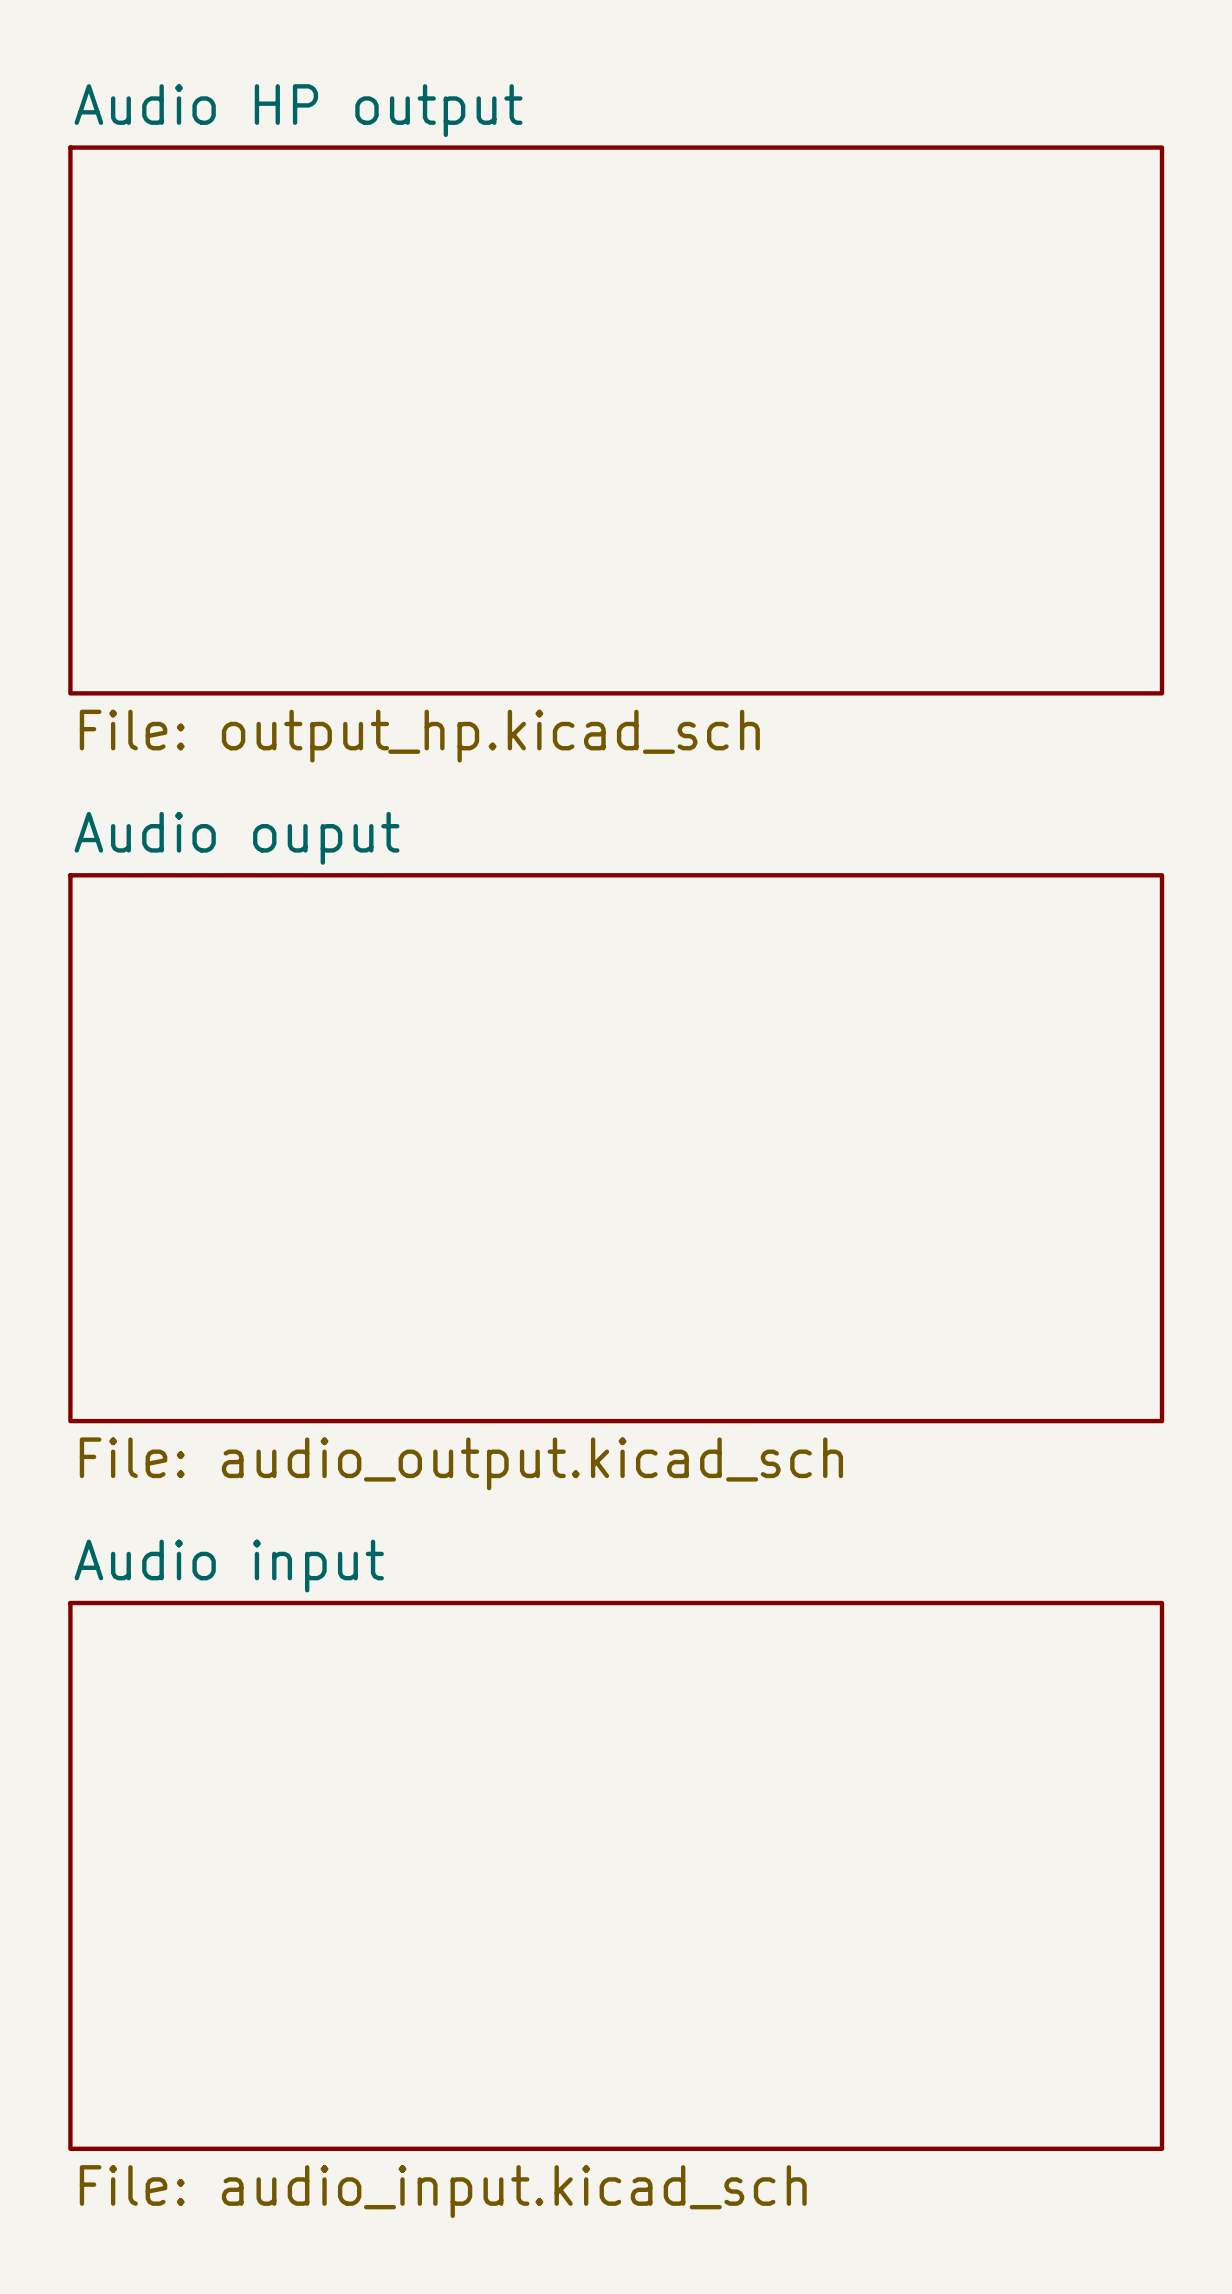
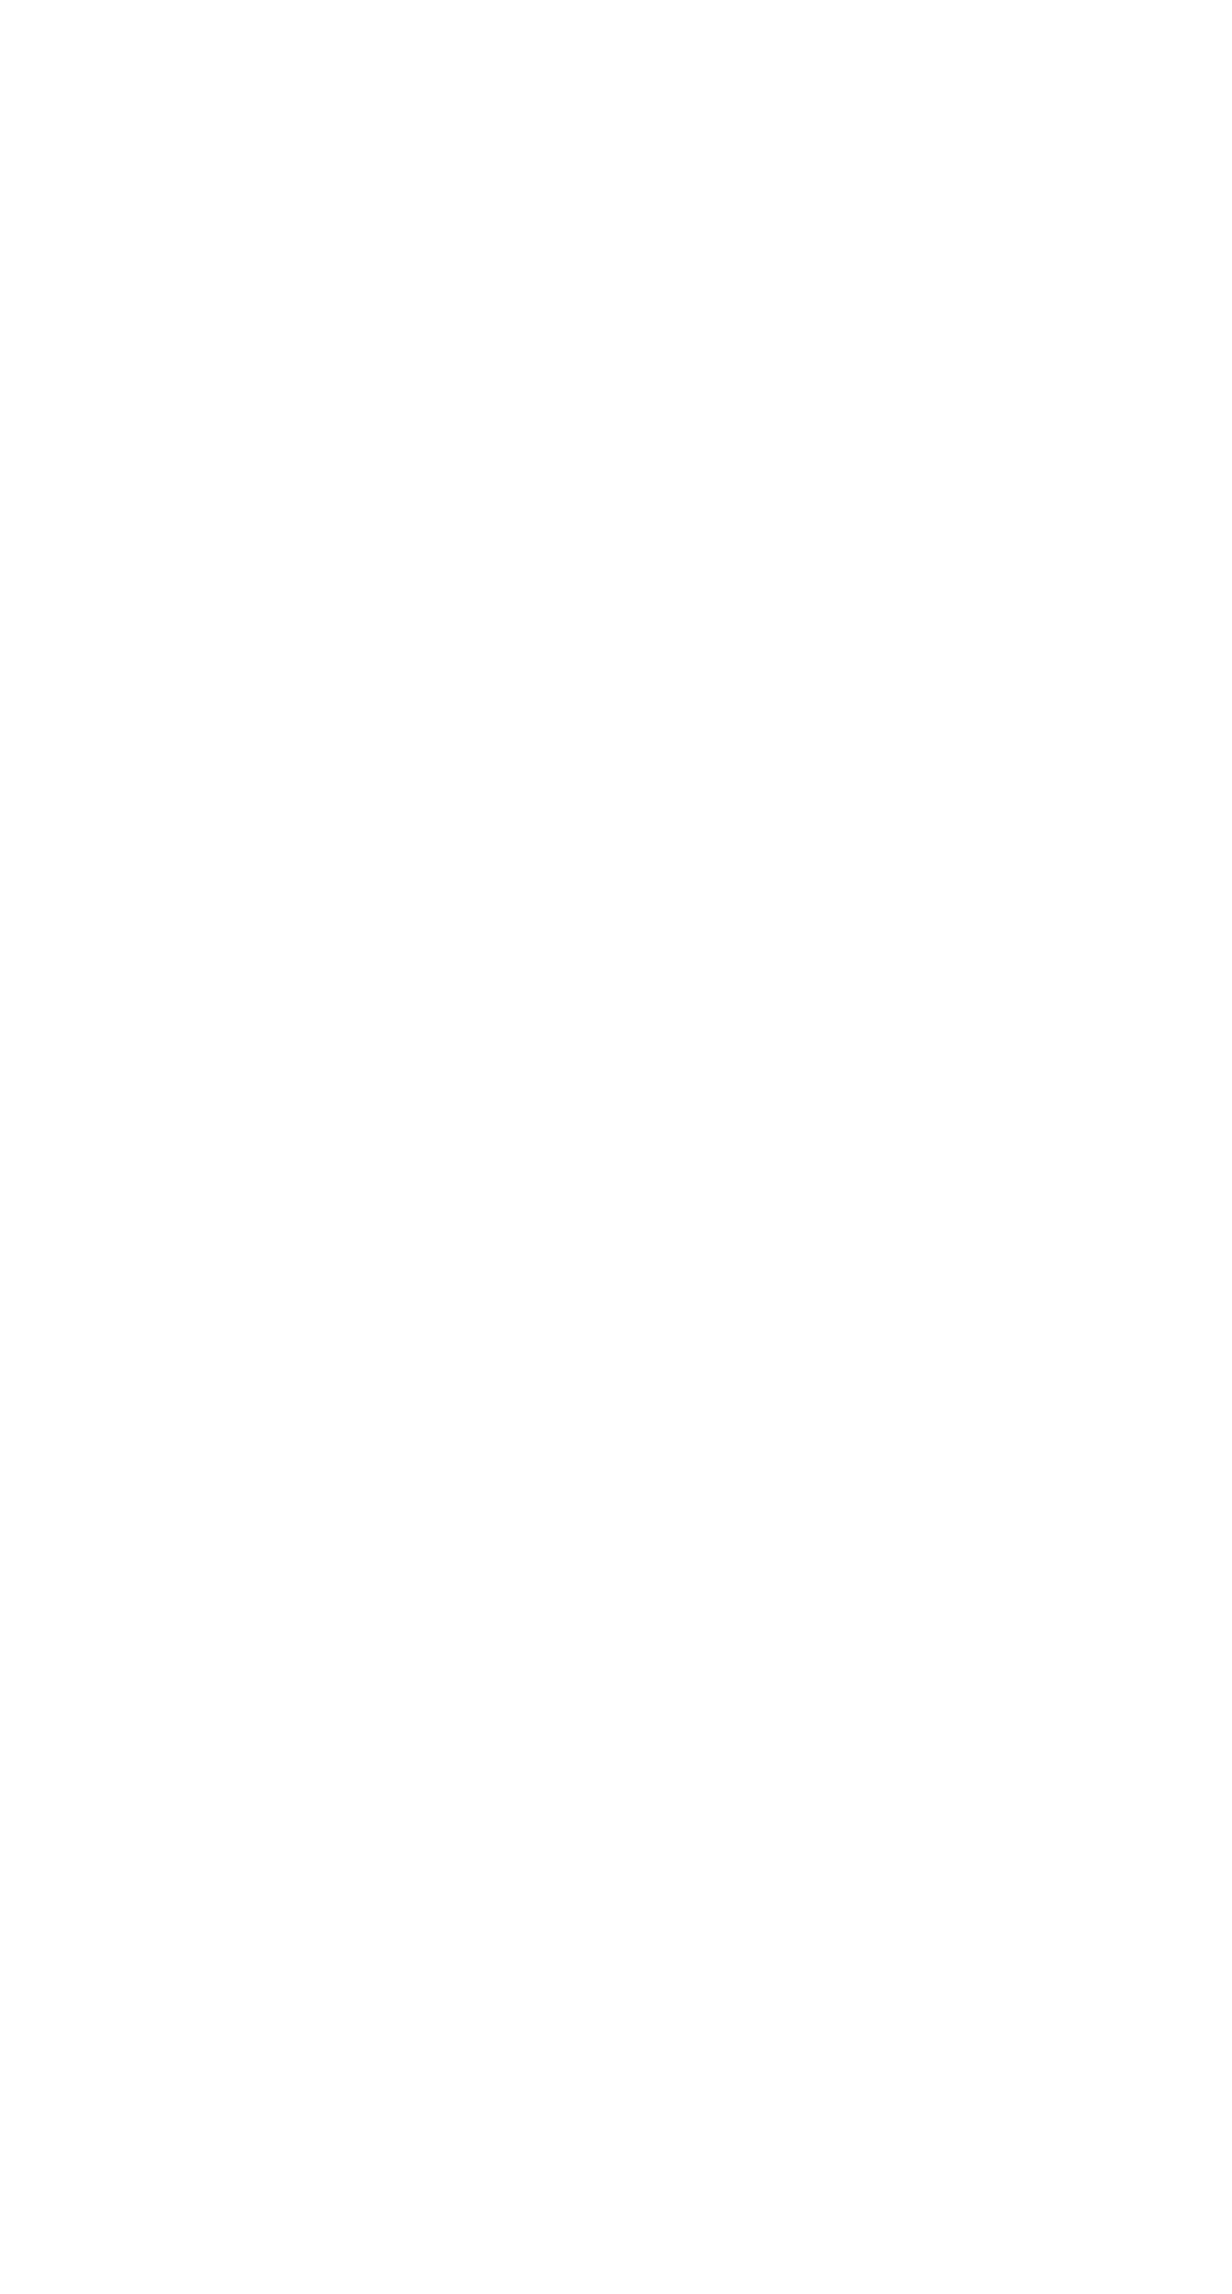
sheet Audio HP output: File: output_hp.kicad_sch (616, 420) -> none
sheet Audio ouput: File: audio_output.kicad_sch (616, 1148) -> none
sheet Audio input: File: audio_input.kicad_sch (616, 1875) -> none

